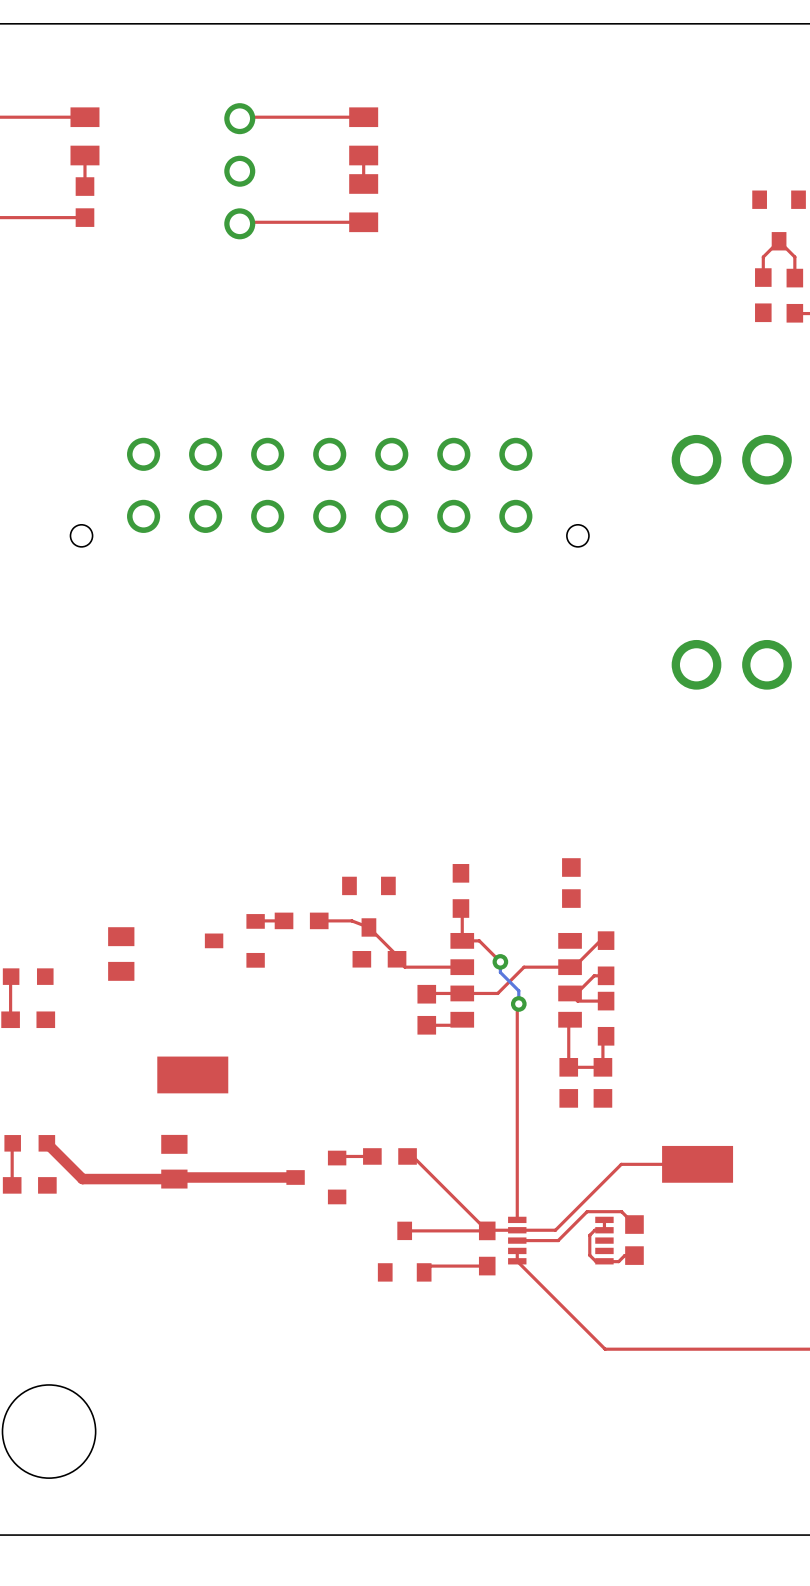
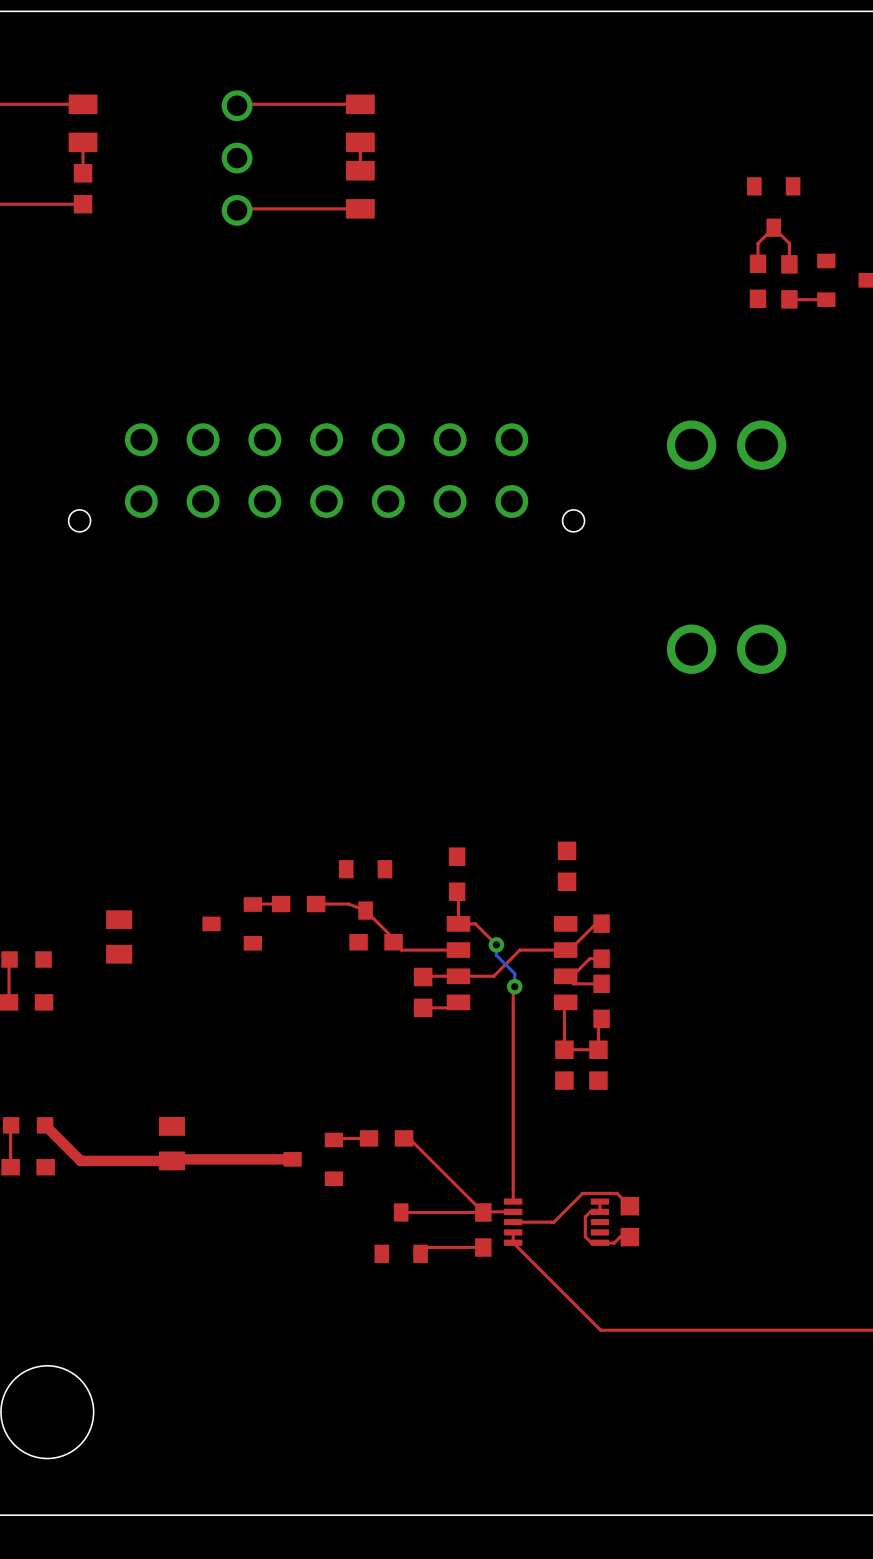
part: (192, 1074) -> none
top track: (697, 1164) (621, 1164) (555, 1230) (517, 1230) -> none
part: (697, 1164) -> none

